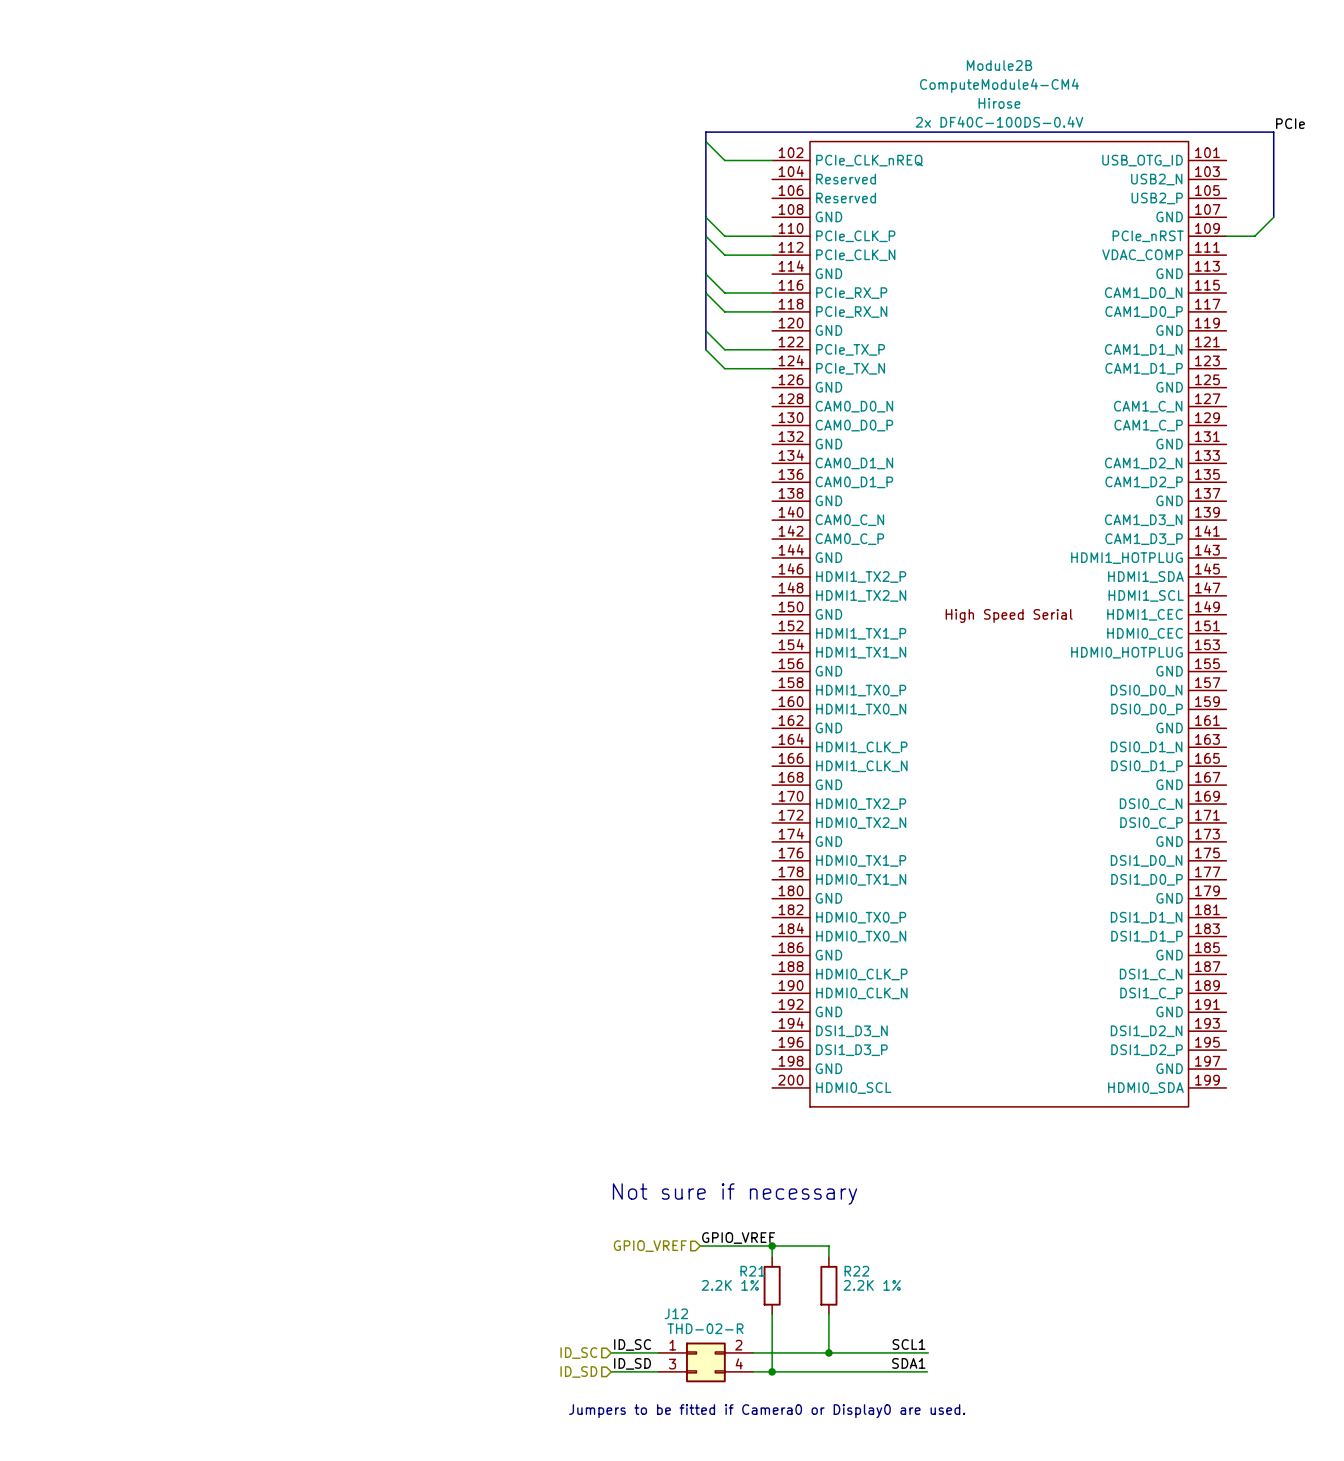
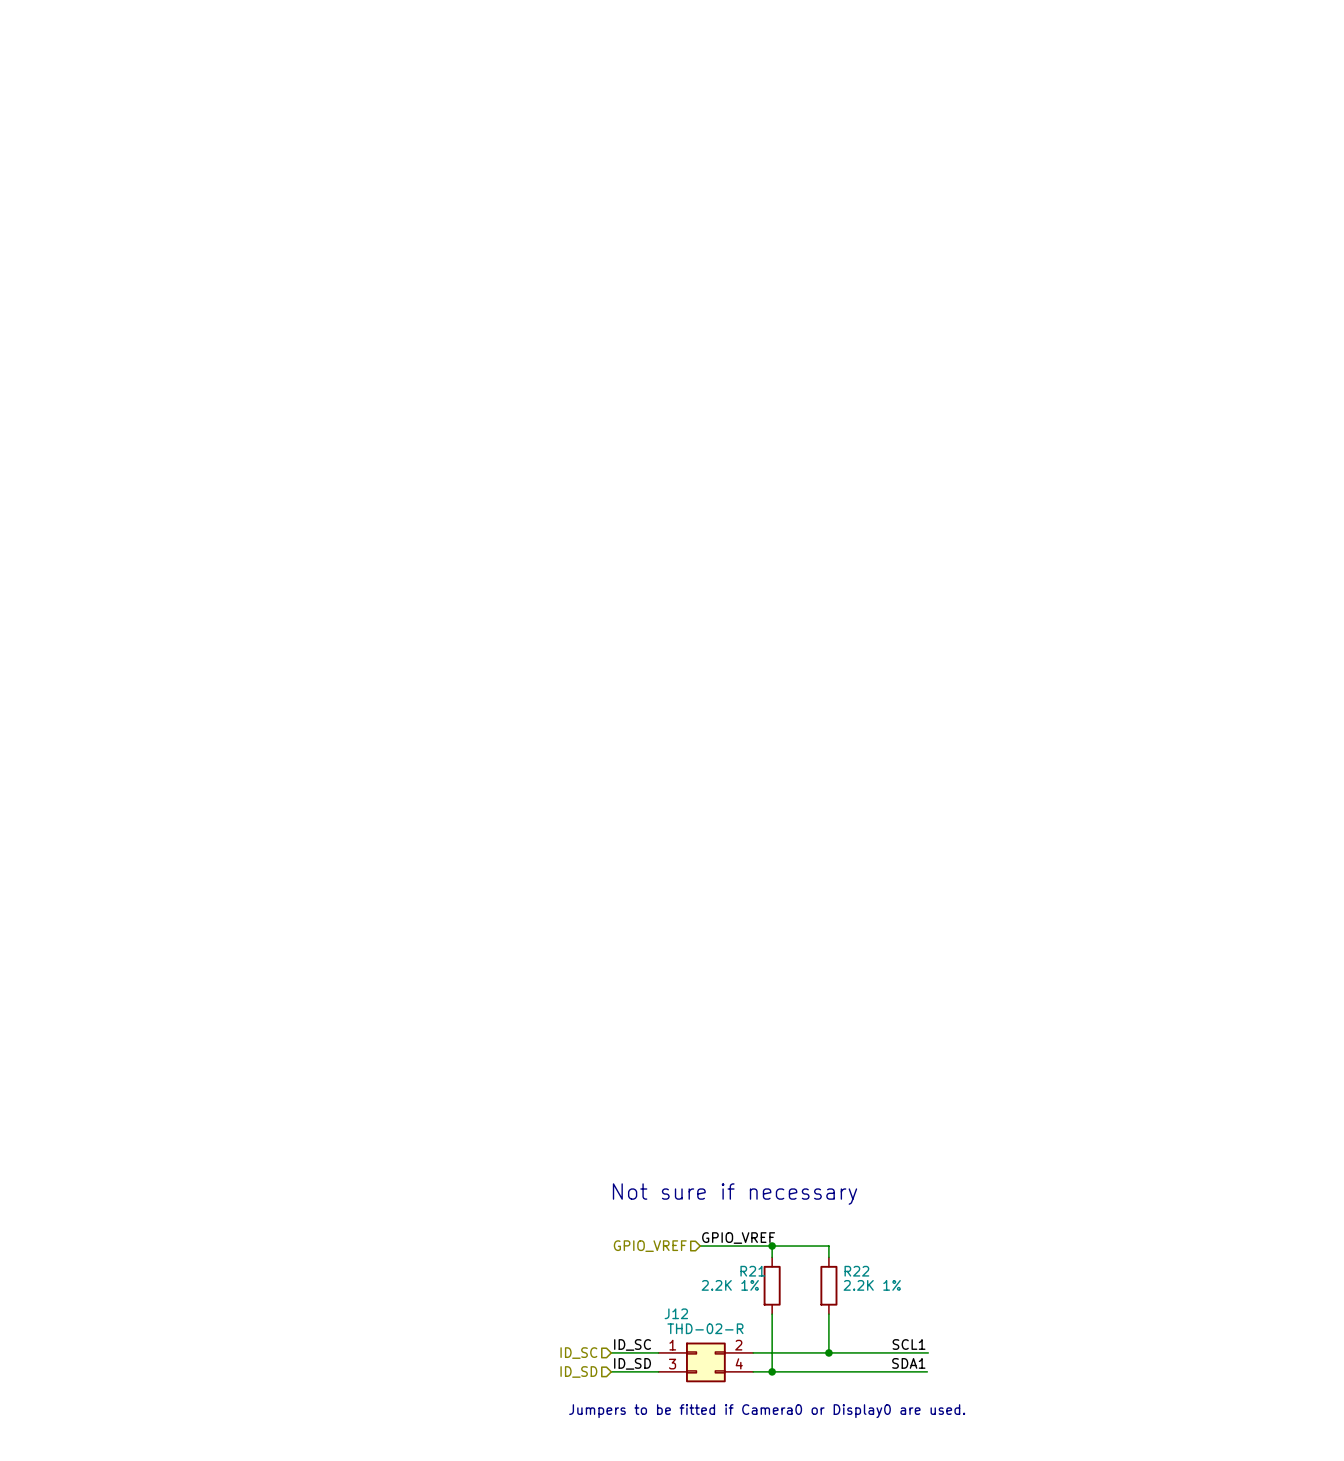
label: PCIe (1290, 123) -> none
wire: (705, 141) (724, 160) (772, 160) -> none
wire: (705, 217) (724, 236) (772, 236) -> none
wire: (1273, 217) (1254, 236) (1226, 236) -> none
bus: (1273, 217) (1273, 132) (705, 132) (705, 349) -> none
wire: (705, 236) (724, 255) (772, 255) -> none
wire: (705, 274) (724, 292) (772, 292) -> none
wire: (705, 292) (724, 311) (772, 311) -> none
wire: (705, 330) (724, 349) (772, 349) -> none
wire: (705, 349) (724, 368) (772, 368) -> none
Module2B: ComputeModule4-CM4 (999, 624) -> none

